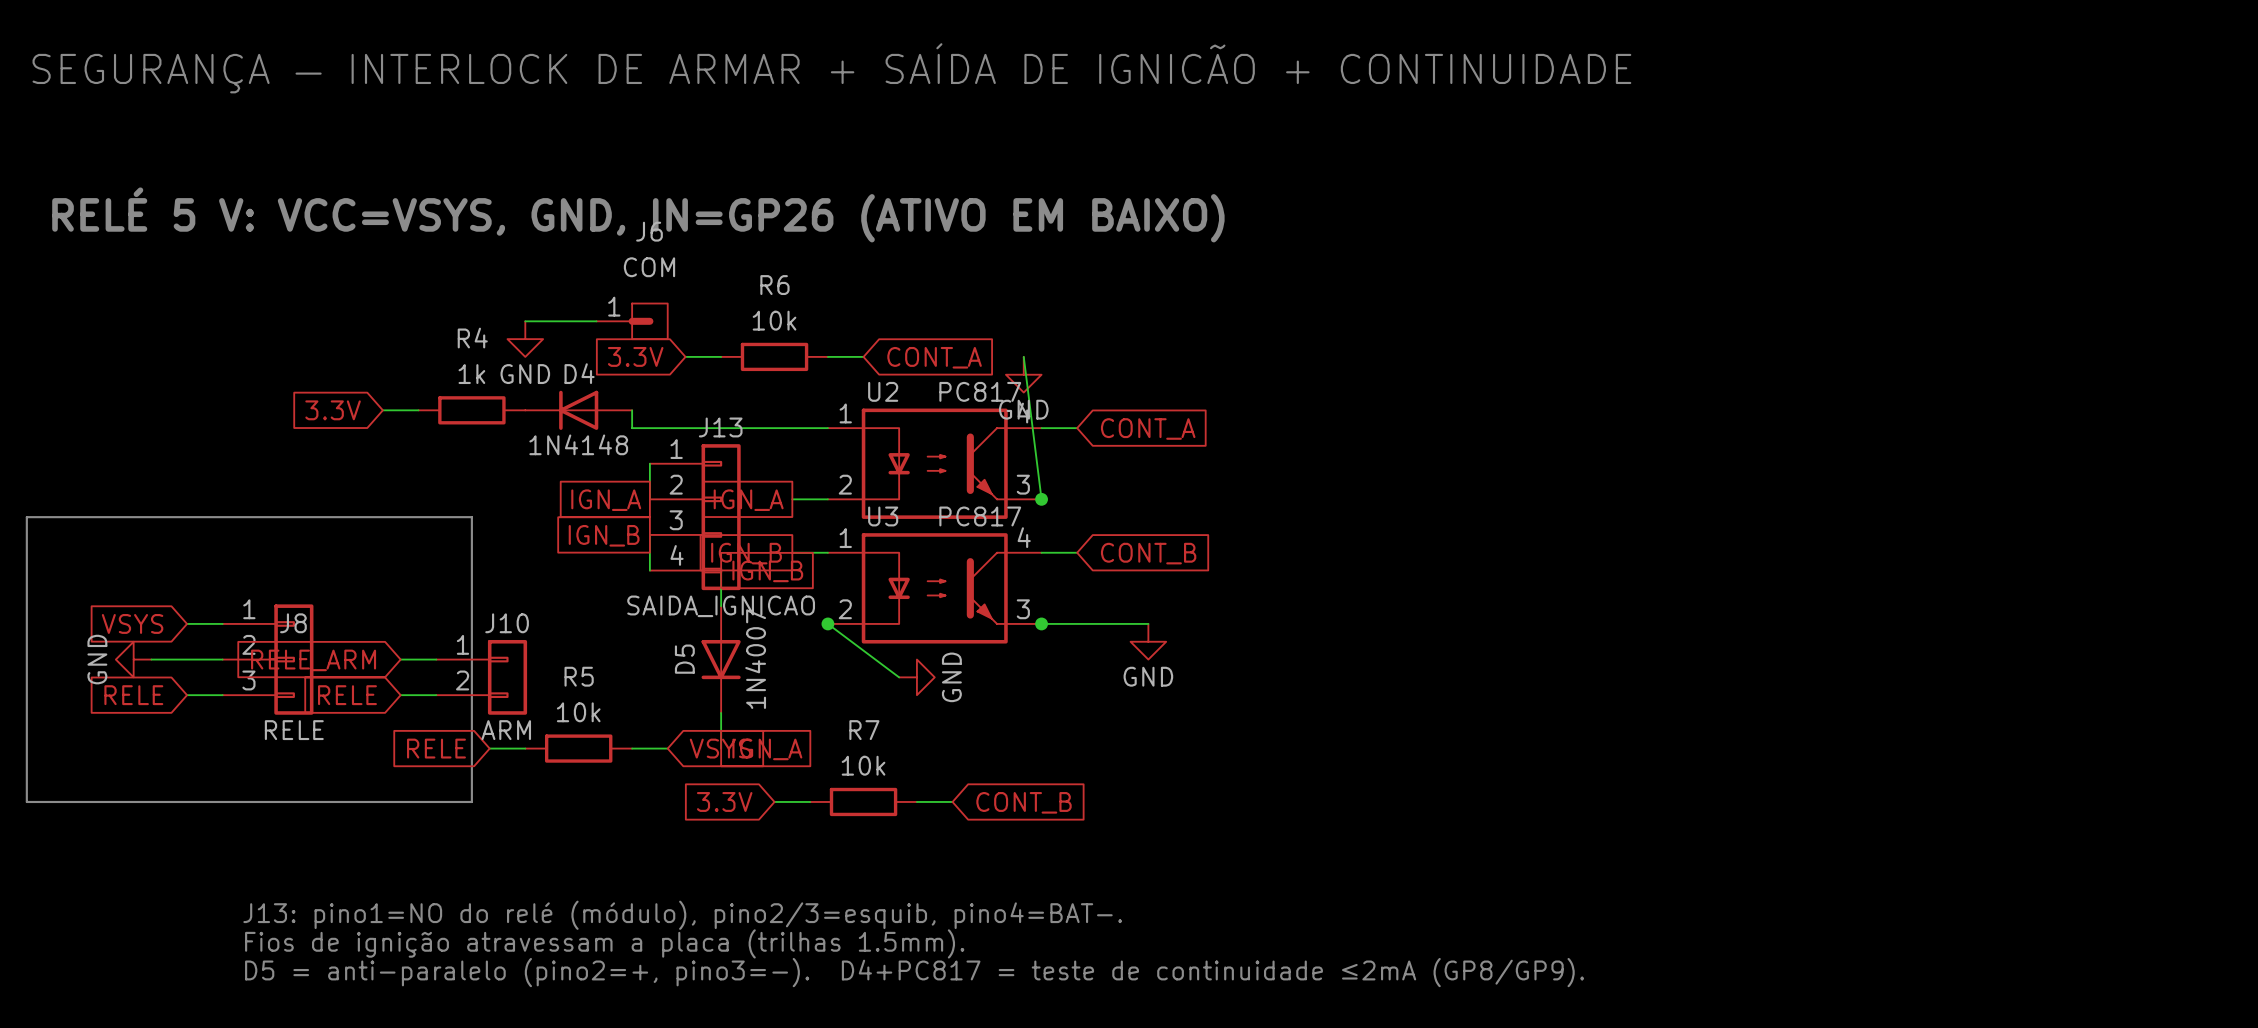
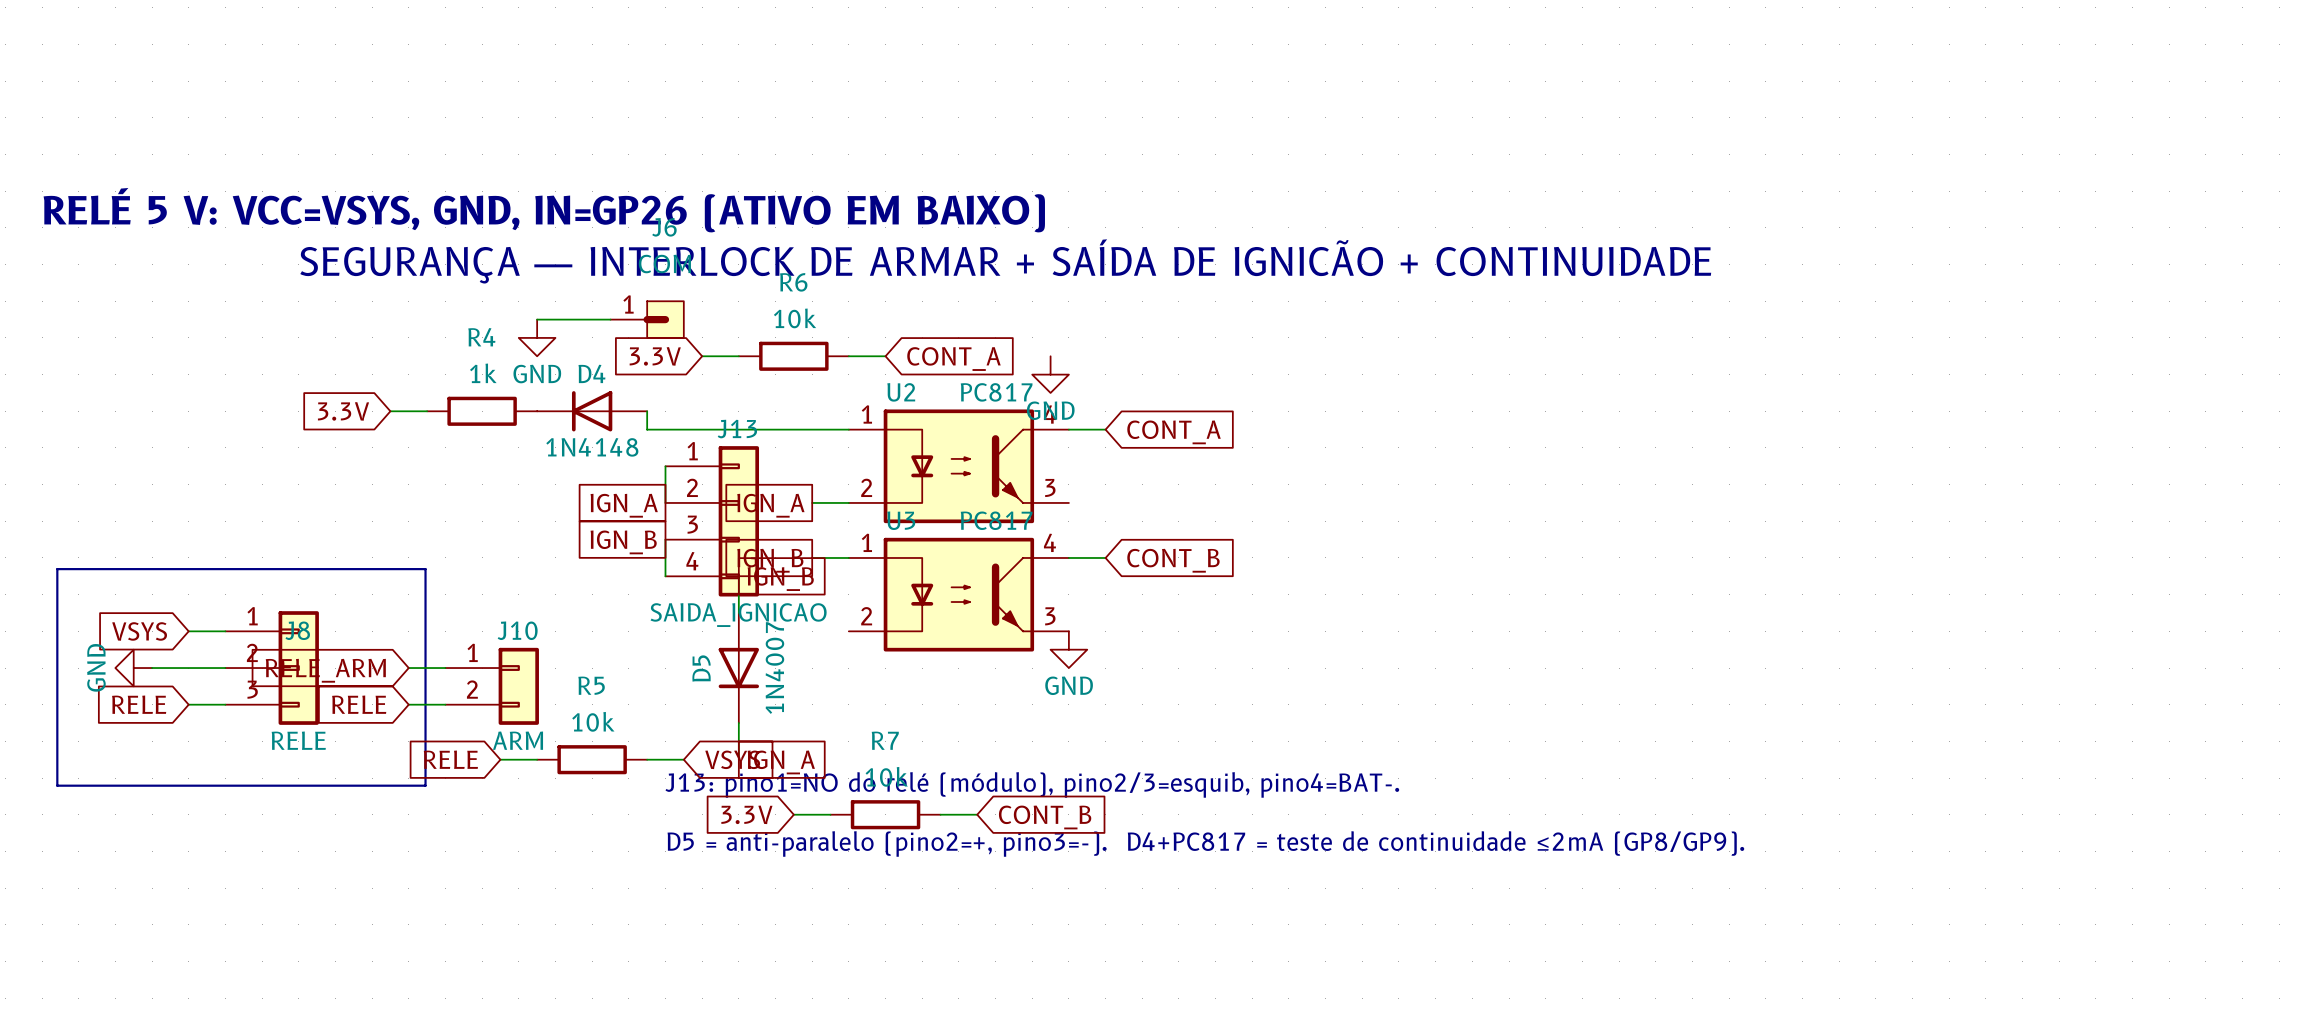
text position: SEGURANÇA — INTERLOCK DE ARMAR + SAÍDA DE IGNICÃO + CONTINUIDADE (831, 68) -> SEGURANÇA — INTERLOCK DE ARMAR + SAÍDA DE IGNICÃO + CONTINUIDADE (1005, 261)
wire: (1023, 356) (1041, 499) -> none
junction: (1041, 499) -> none
line: (26, 517) (471, 517) (471, 801) (26, 801) (26, 517) -> (57, 569) (57, 785) (425, 785) (425, 569) (57, 569)
wire: (827, 623) (899, 677) -> none
junction: (827, 623) -> none
wire: (1041, 623) (1148, 623) -> none
junction: (1041, 623) -> none
power symbol: none -> GND (1068, 649)
power symbol: GND (1148, 641) -> none
power symbol: GND (916, 677) -> none
text: none -> J13: pino1=NO do relé (módulo), pino2/3=esquib, pino4=BAT-. (1032, 784)
text: none -> D5 = anti-paralelo (pino2=+, pino3=-). D4+PC817 = teste de continuidade ≤2mA (GP8/GP9). (1205, 843)
text: J13: pino1=NO do relé (módulo), pino2/3=esquib, pino4=BAT-. (682, 915) -> none
text: Fios de ignição atravessam a placa (trilhas 1.5mm). (604, 943) -> none
text: D5 = anti-paralelo (pino2=+, pino3=-). D4+PC817 = teste de continuidade ≤2mA (GP8/GP9). (914, 972) -> none

